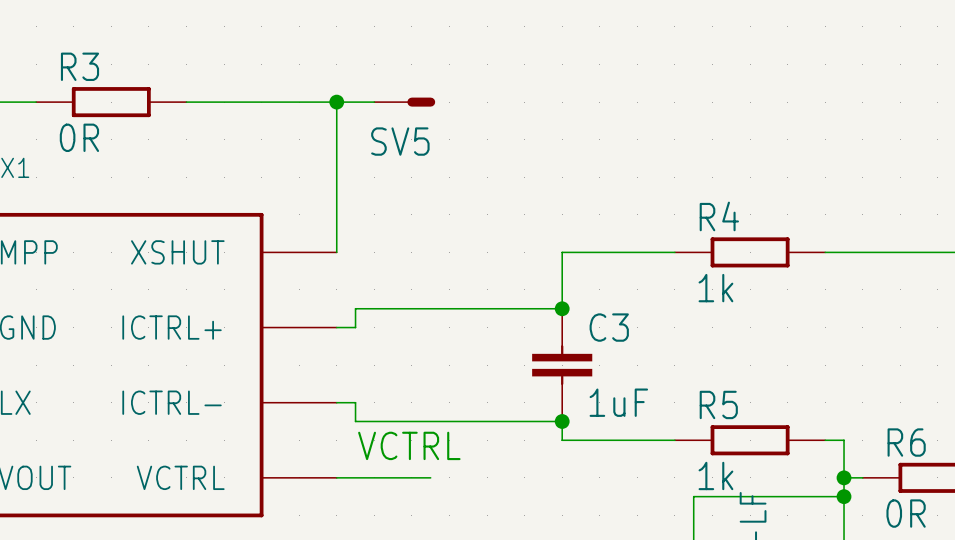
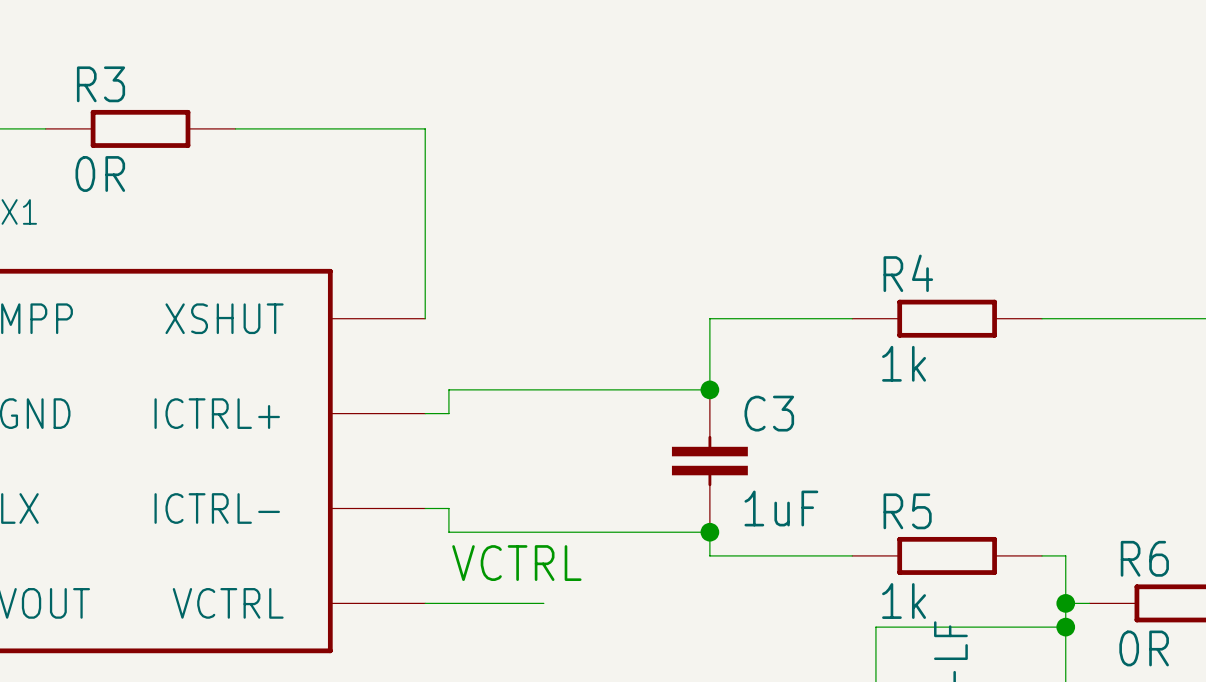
wire: (336, 102) (374, 102) -> none
junction: (336, 102) -> none
SV5: (404, 102) -> none

